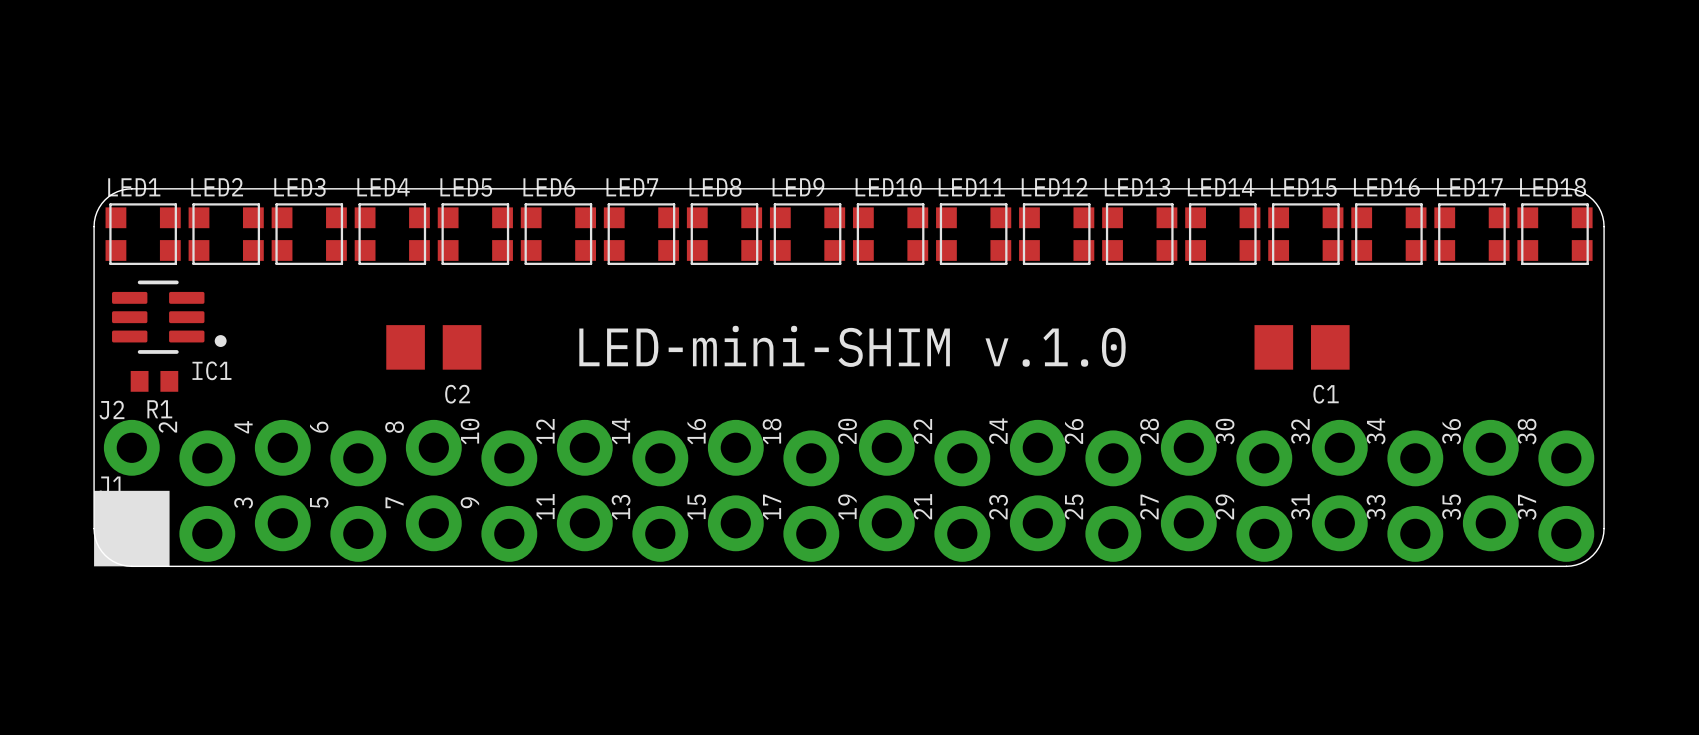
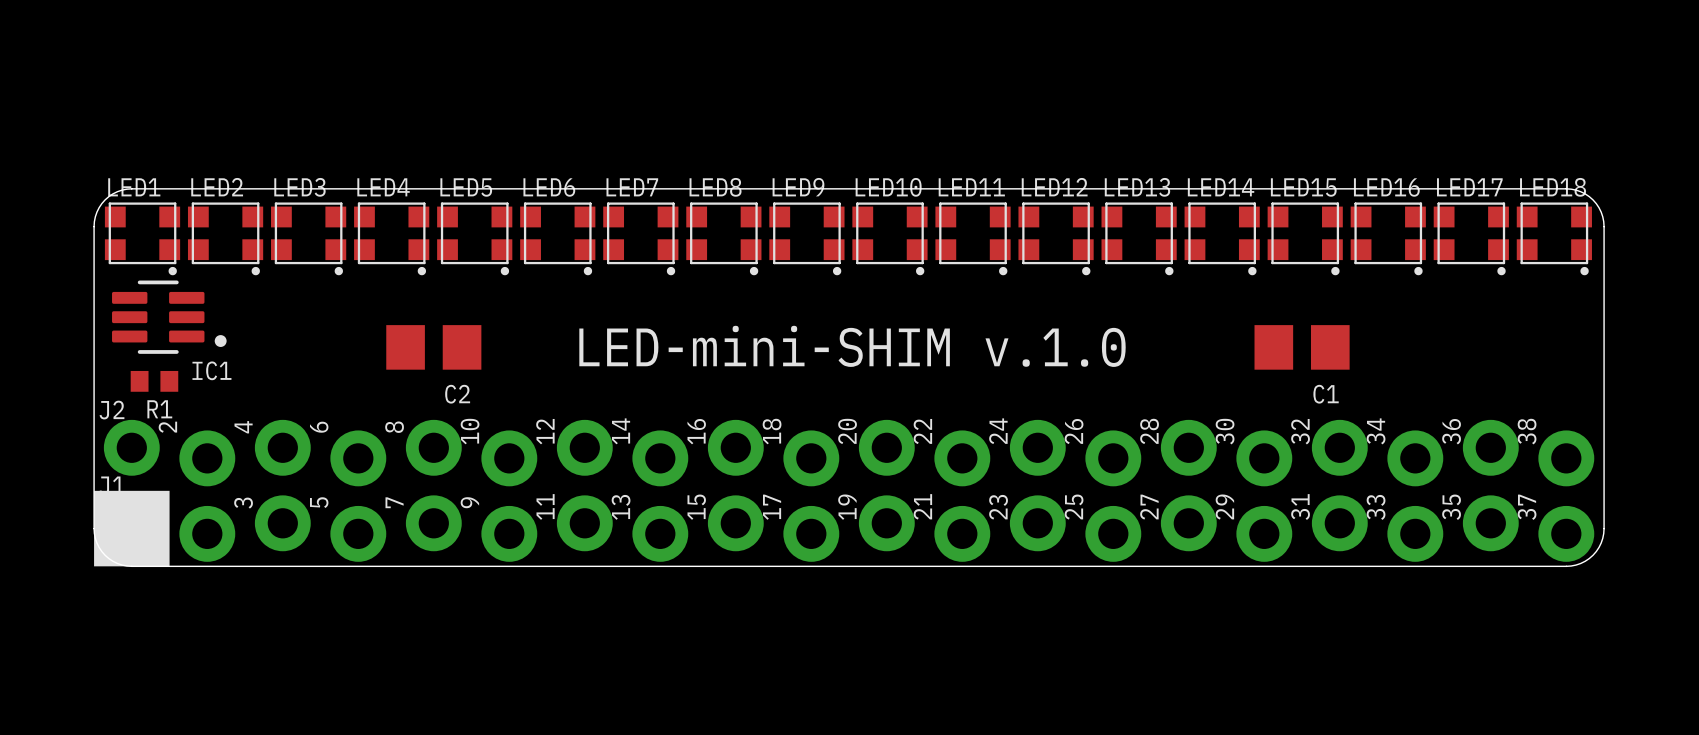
LED1 footprint: [105, 203, 181, 266] -> [104, 202, 181, 276]
LED2 footprint: [188, 203, 264, 266] -> [187, 202, 264, 276]
LED3 footprint: [271, 203, 347, 266] -> [271, 202, 347, 276]
LED4 footprint: [354, 203, 430, 266] -> [354, 202, 430, 276]
LED5 footprint: [437, 203, 513, 266] -> [437, 202, 513, 276]
LED6 footprint: [520, 203, 596, 266] -> [520, 202, 596, 276]
LED7 footprint: [603, 203, 680, 266] -> [603, 202, 679, 276]
LED8 footprint: [686, 203, 763, 266] -> [686, 202, 762, 276]
LED9 footprint: [769, 203, 846, 266] -> [769, 202, 845, 276]
LED10 footprint: [852, 203, 929, 266] -> [852, 202, 928, 276]
LED11 footprint: [936, 203, 1012, 266] -> [935, 202, 1011, 276]
LED12 footprint: [1019, 203, 1095, 266] -> [1018, 202, 1094, 276]
LED13 footprint: [1102, 203, 1178, 266] -> [1101, 202, 1177, 276]
LED14 footprint: [1185, 203, 1261, 266] -> [1184, 202, 1260, 276]
LED15 footprint: [1268, 203, 1344, 266] -> [1267, 202, 1343, 276]
LED16 footprint: [1351, 203, 1427, 266] -> [1350, 202, 1426, 276]
LED17 footprint: [1434, 203, 1510, 266] -> [1433, 202, 1509, 276]
LED18 footprint: [1517, 203, 1593, 266] -> [1516, 202, 1592, 276]

